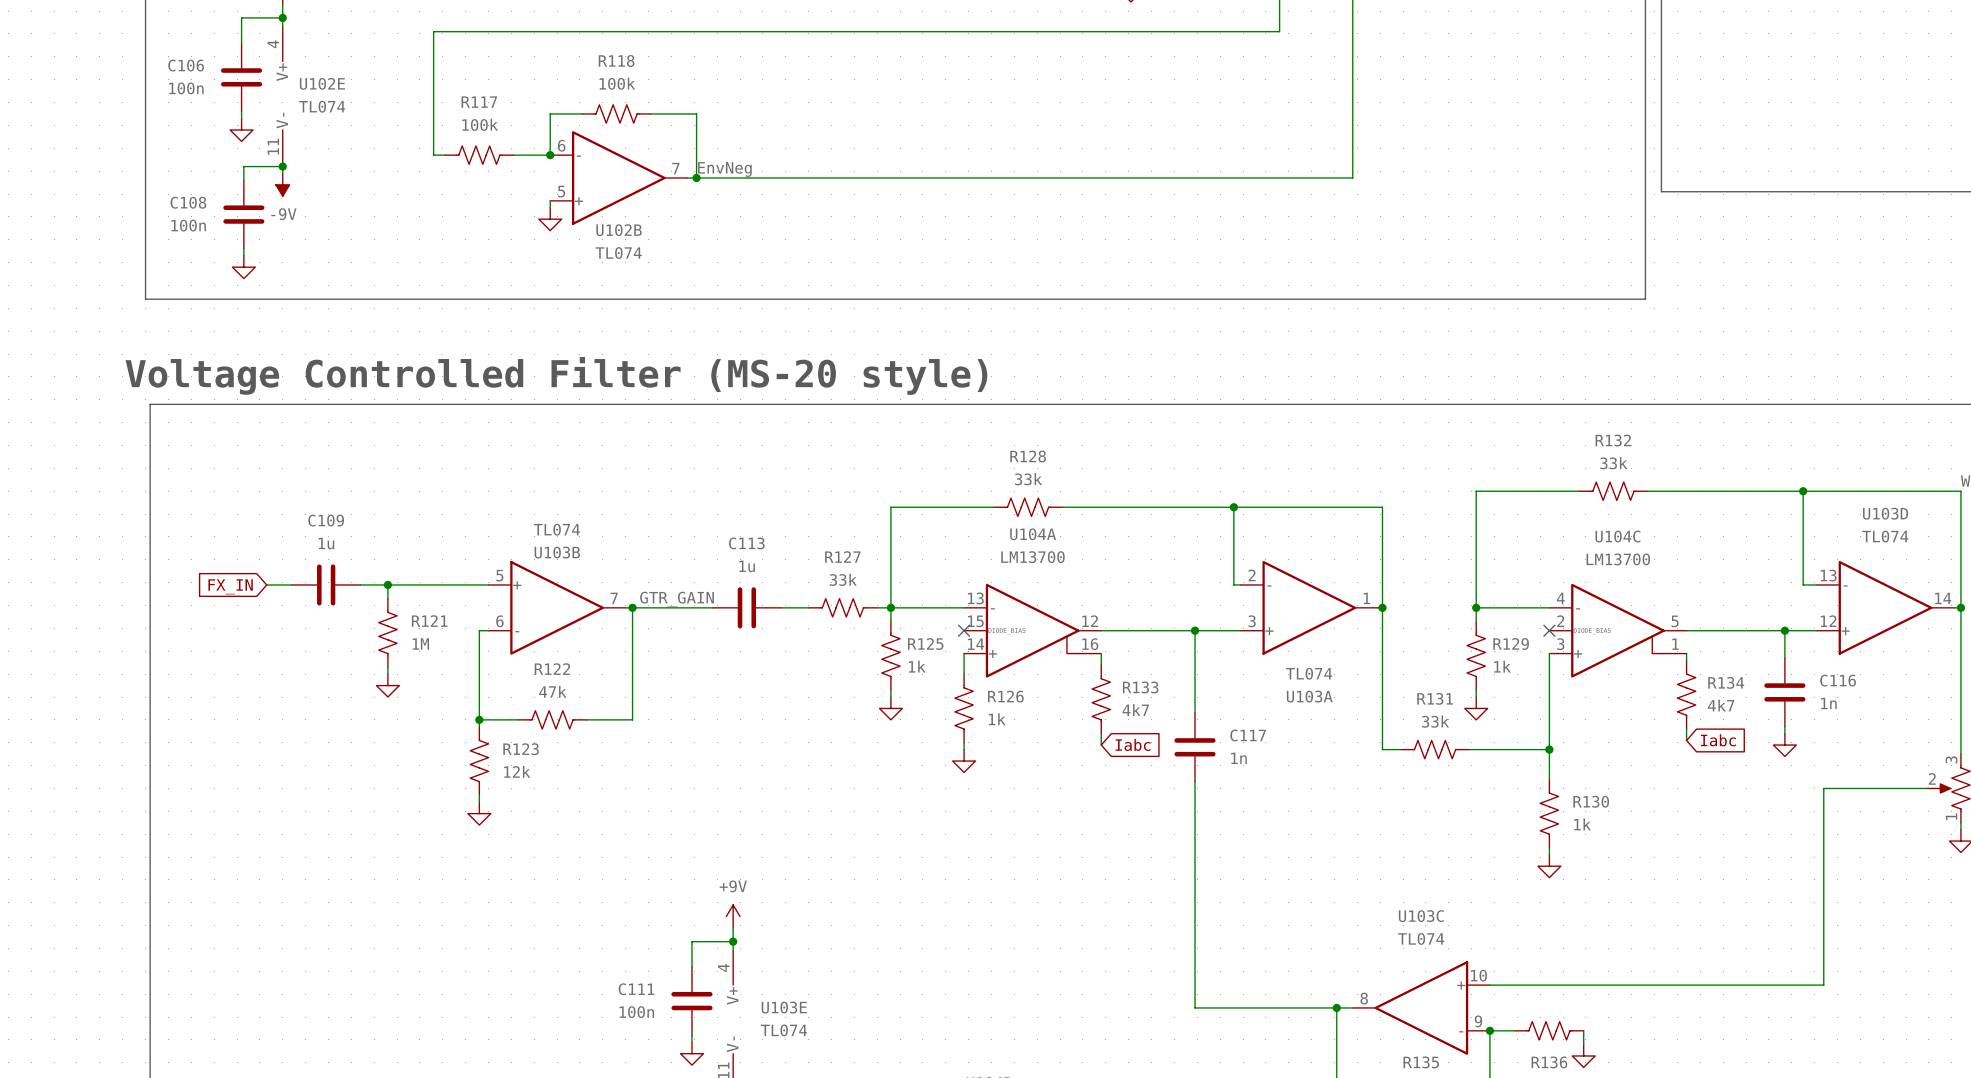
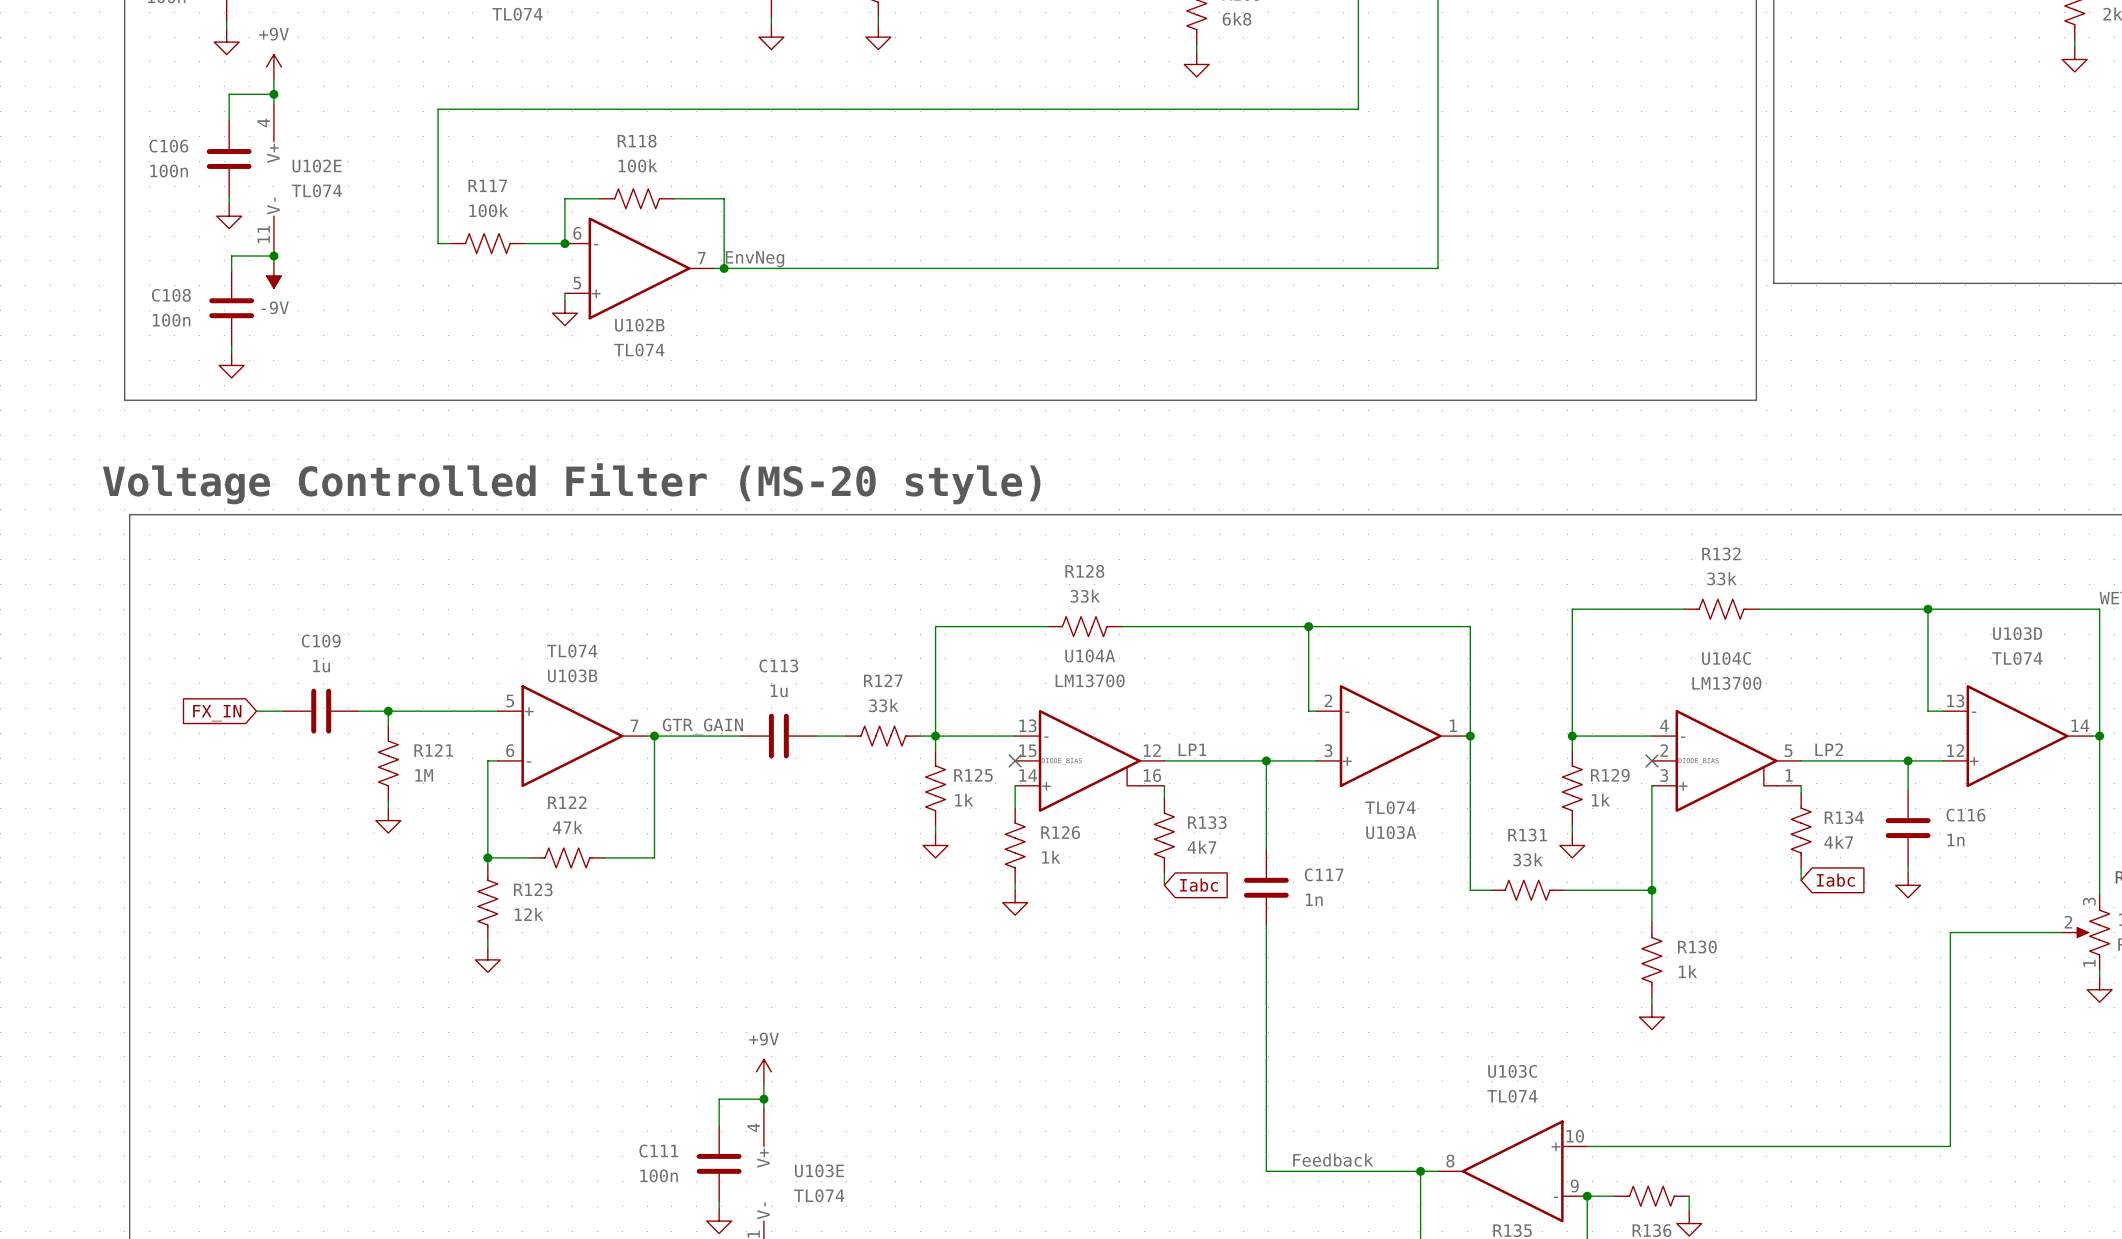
label: none -> LP1 (1192, 749)
label: none -> LP2 (1829, 749)
label: none -> Feedback (1333, 1160)

